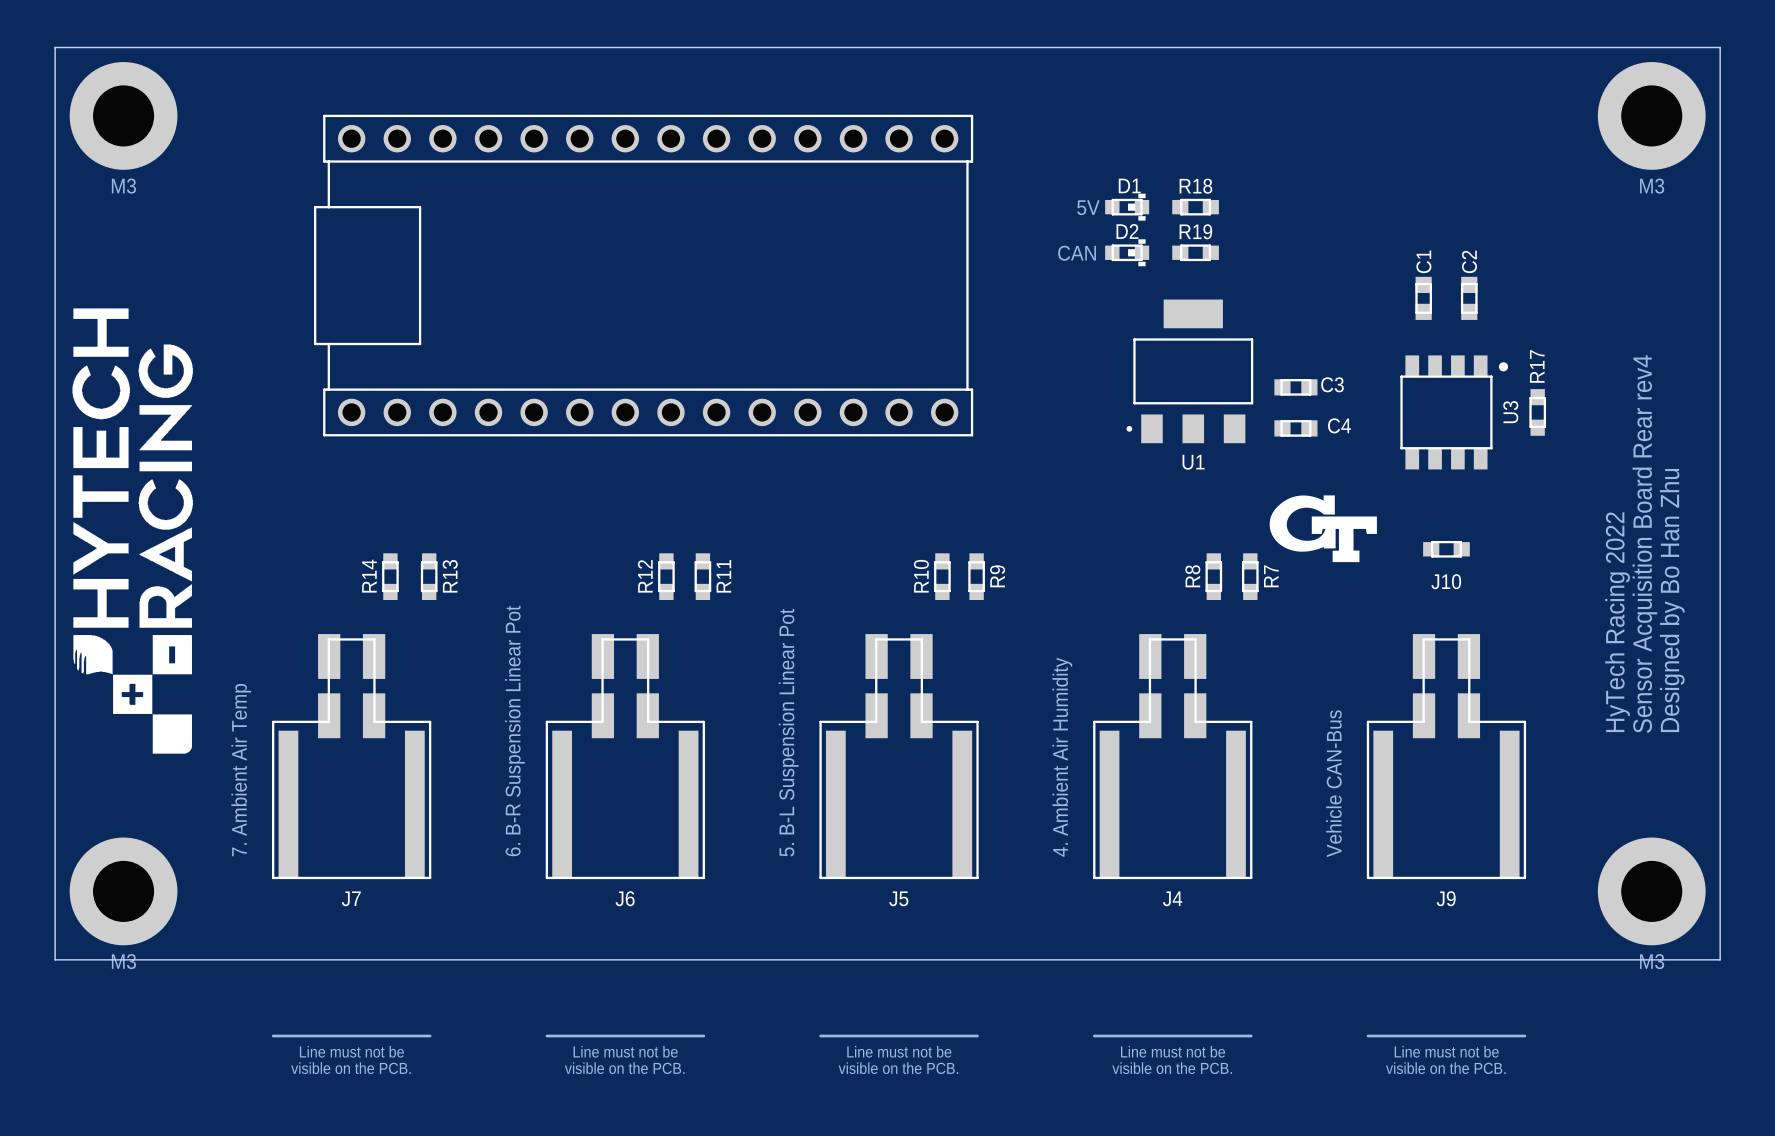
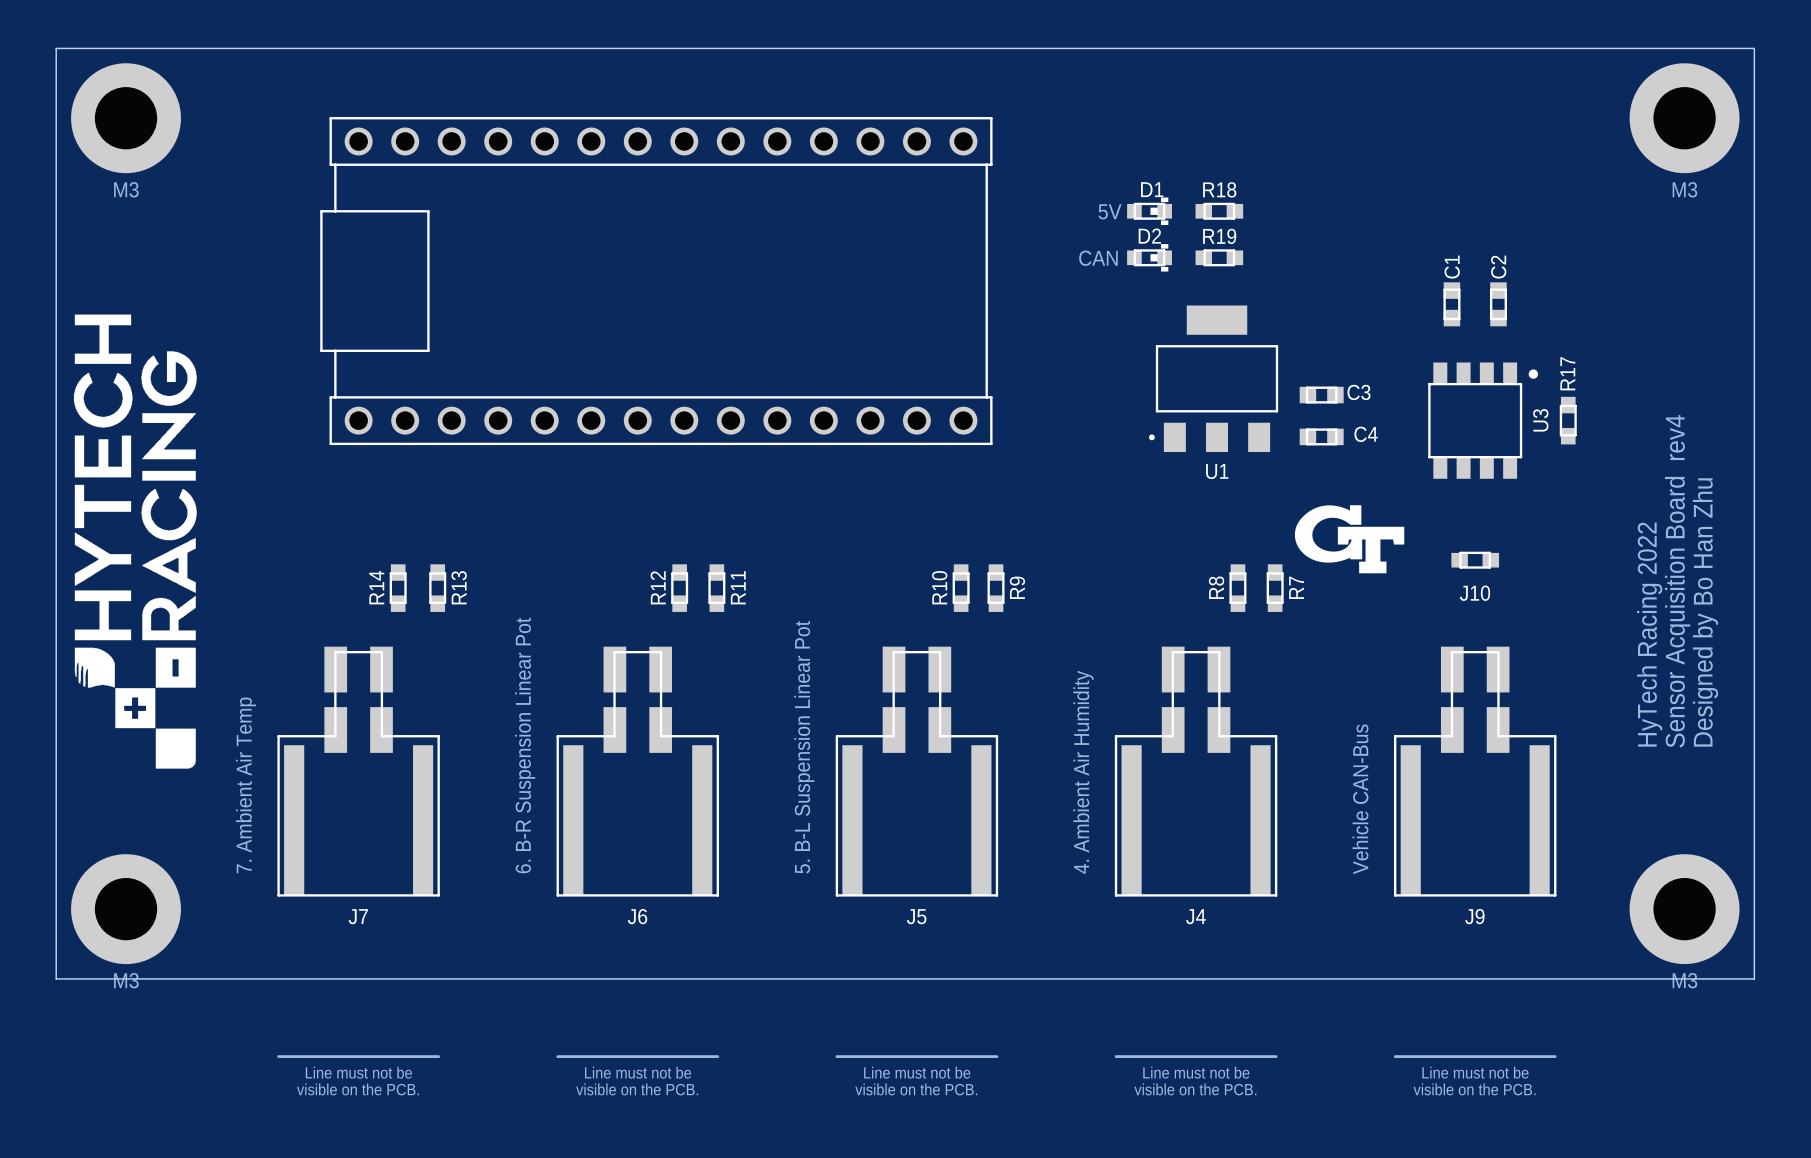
text: Sensor Acquisition Board Rear rev4 (1644, 544) -> Sensor Acquisition Board rev4 (1677, 581)

